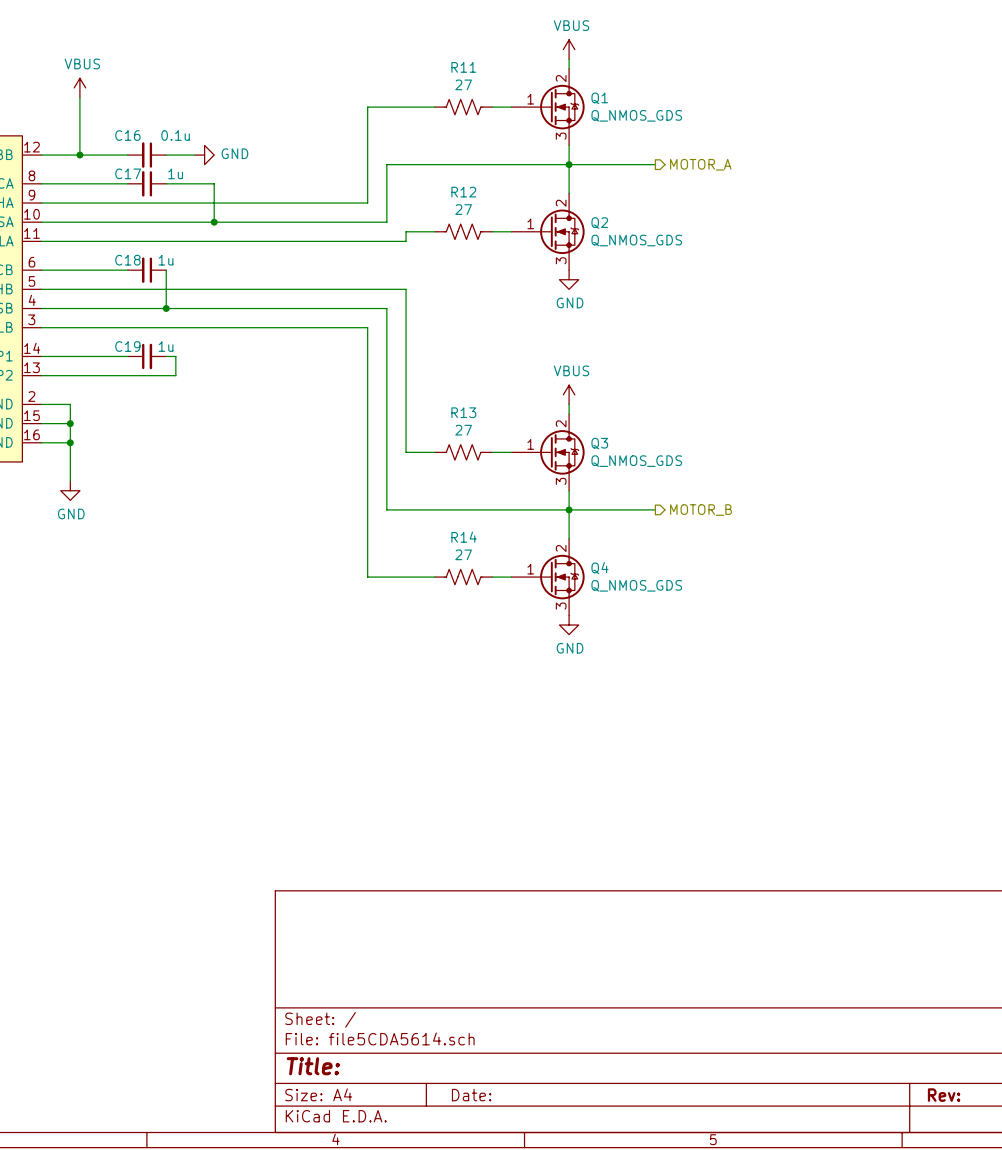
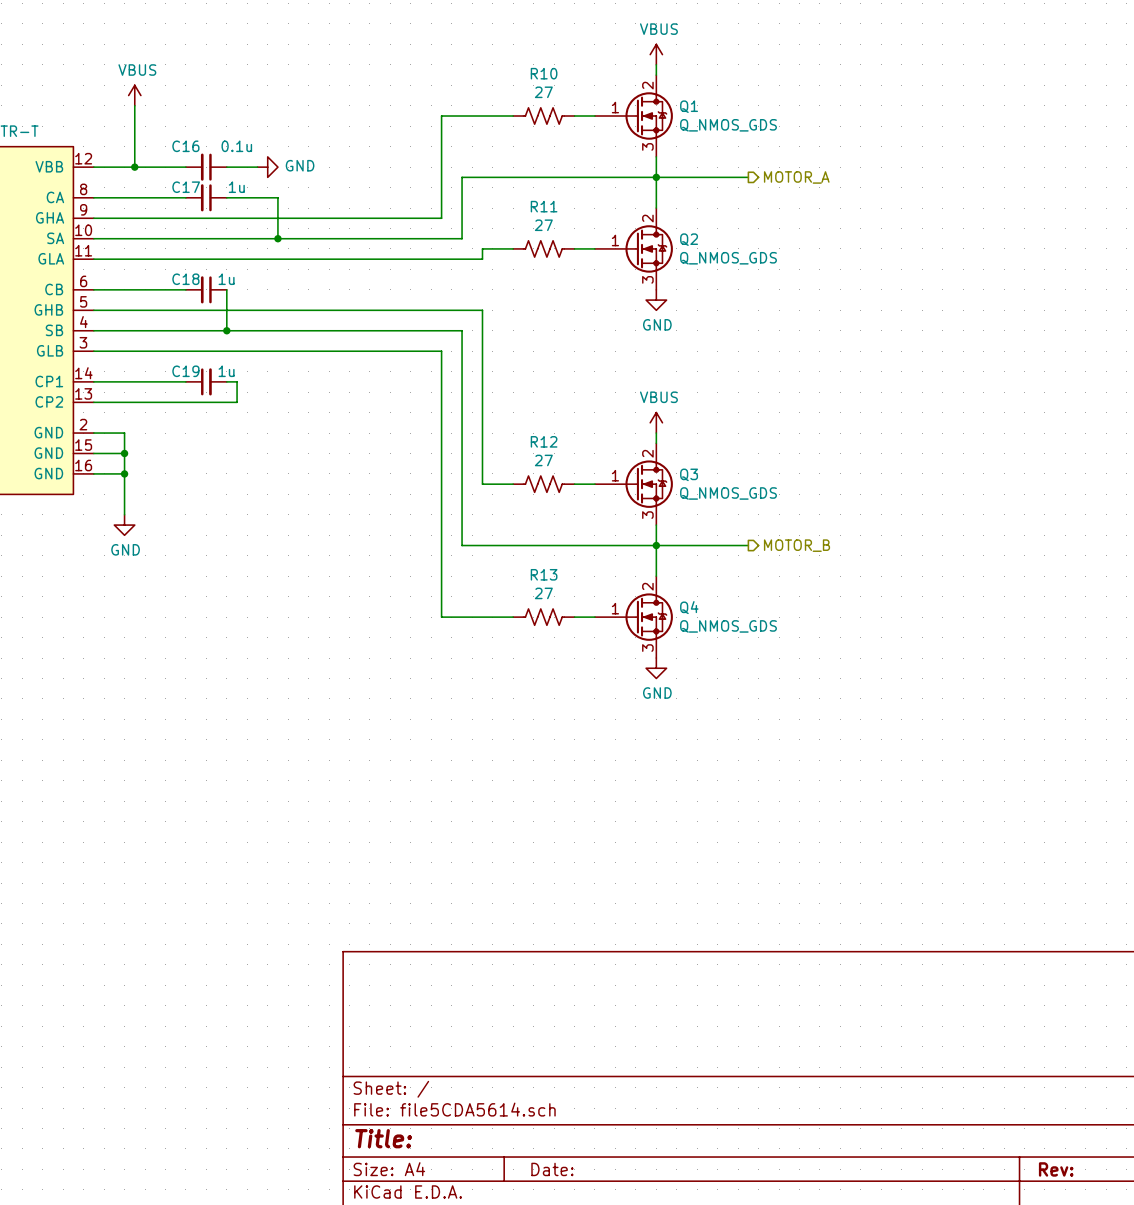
R11 name: R11 (463, 67) -> R10 (544, 73)
R12 name: R12 (463, 192) -> R11 (544, 206)
R13 name: R13 (463, 412) -> R12 (544, 441)
R14 name: R14 (464, 537) -> R13 (544, 574)

